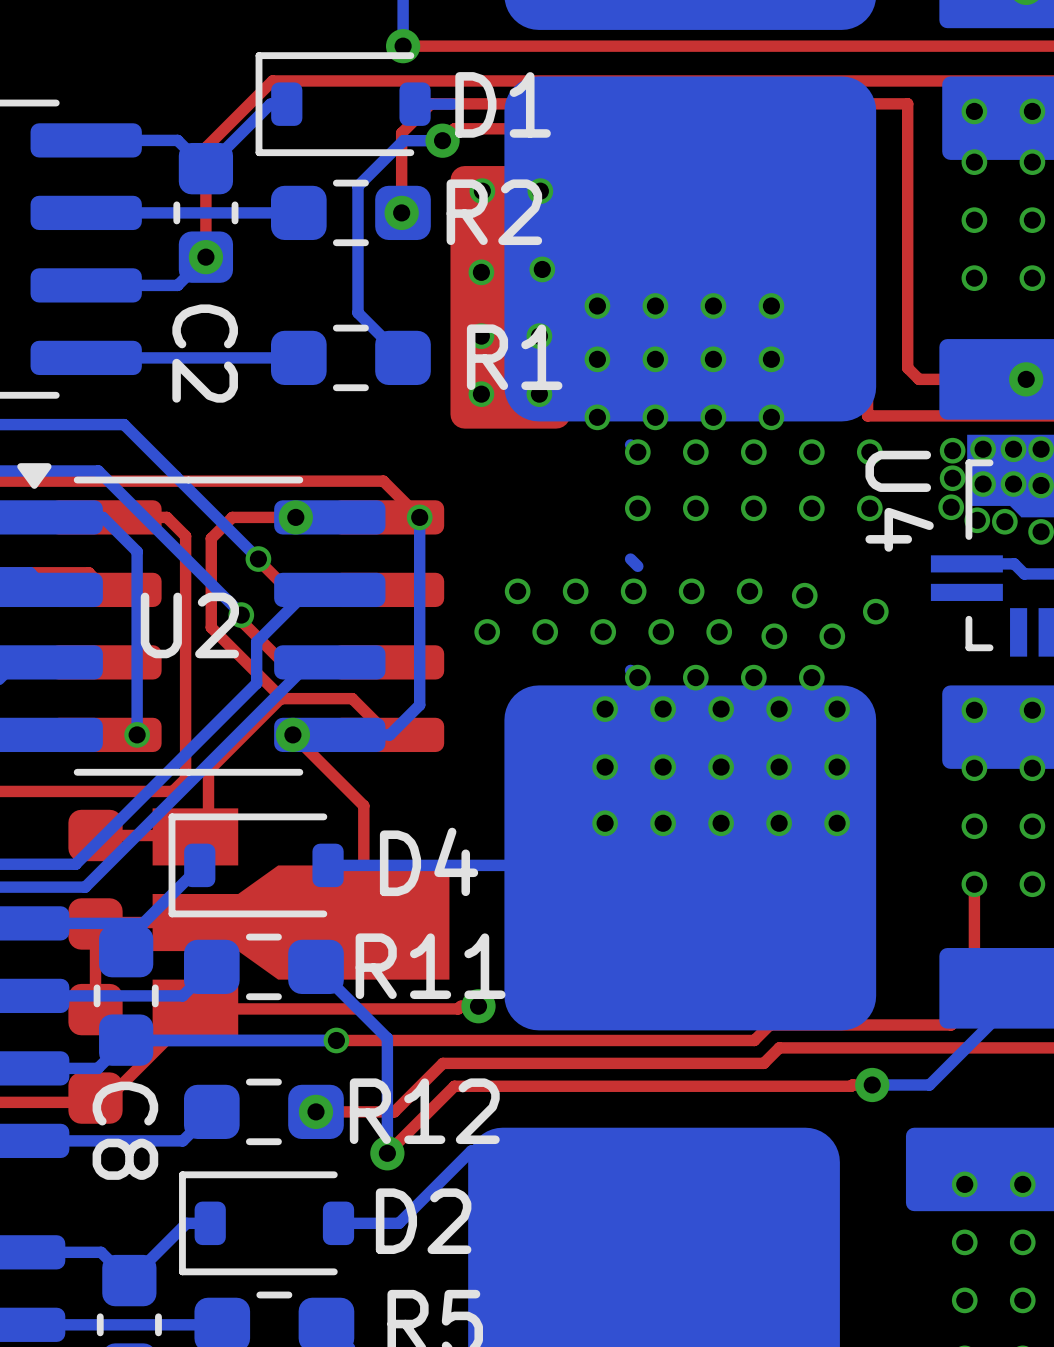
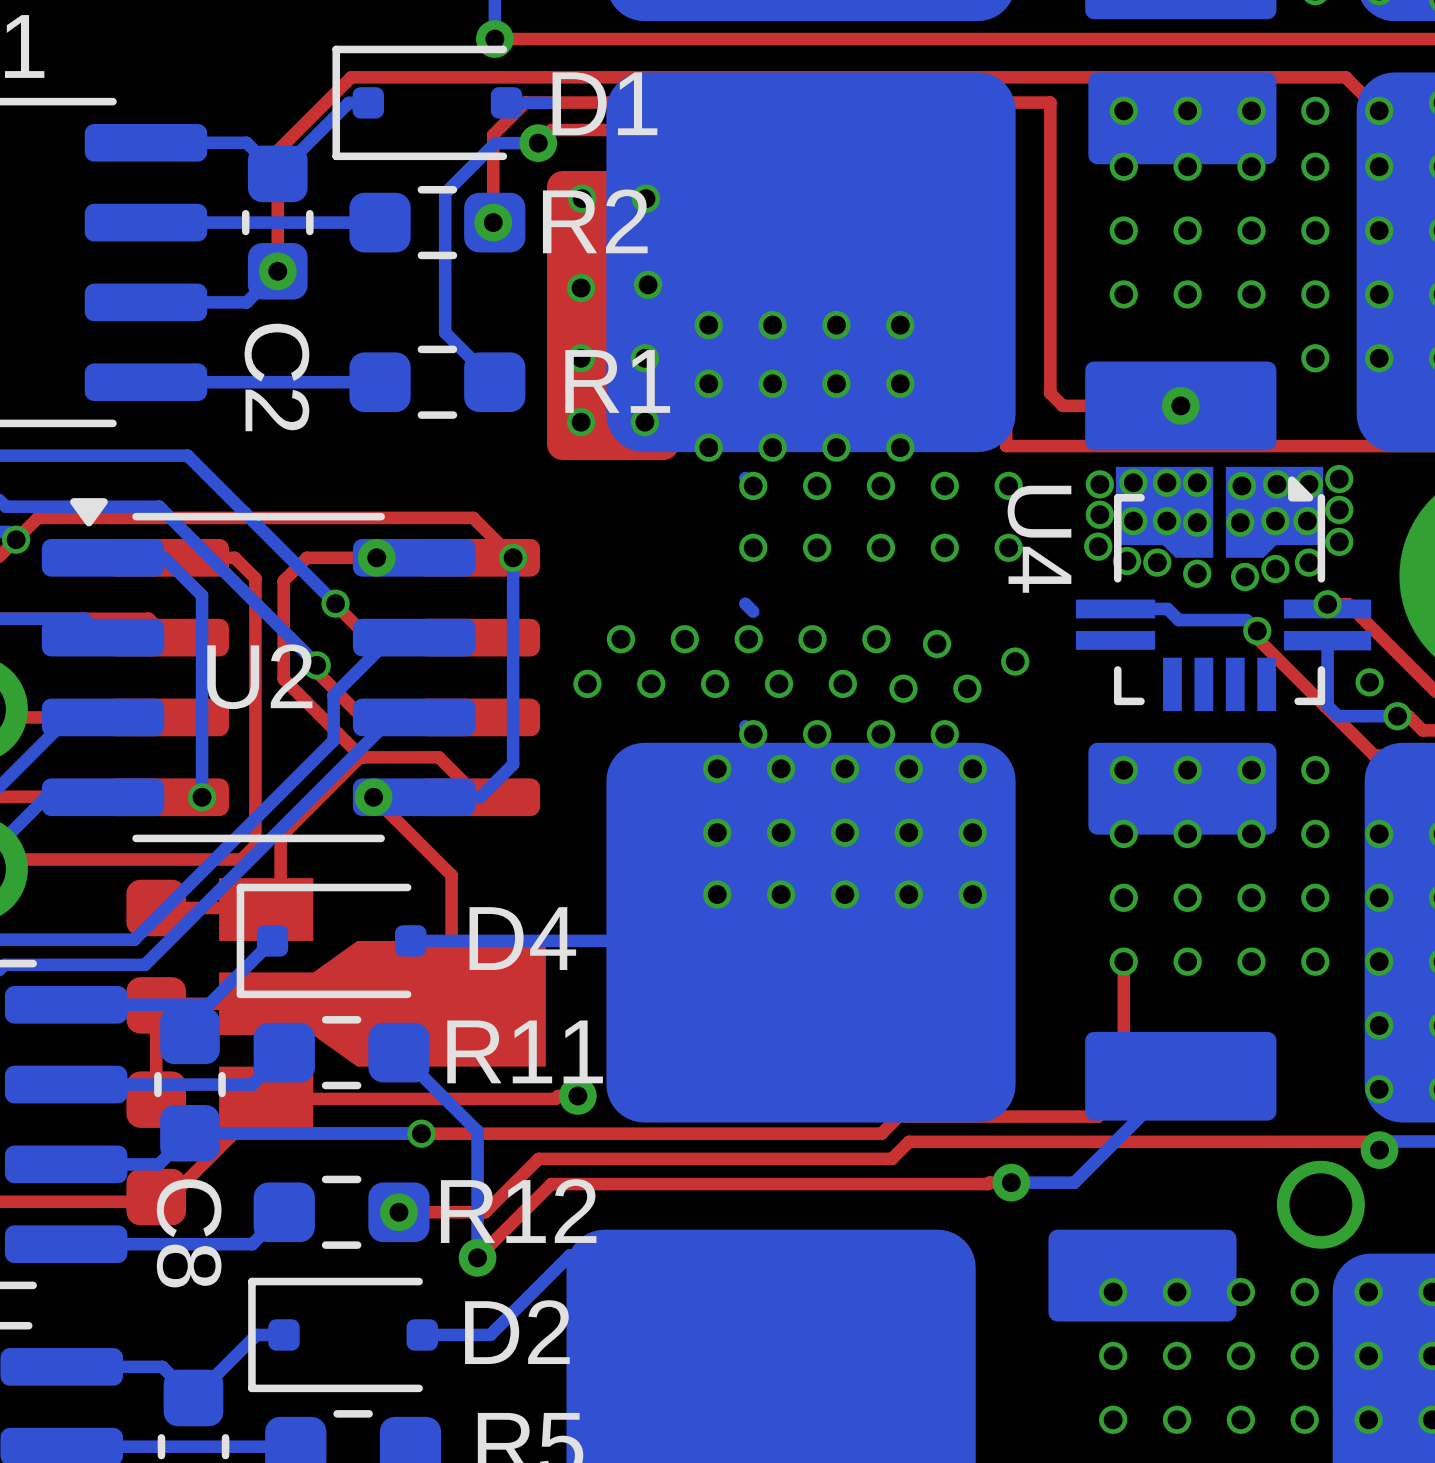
D1 footprint: [255, 52, 431, 157] -> [332, 45, 523, 161]
D4 footprint: [168, 813, 344, 918] -> [236, 883, 427, 999]
D2 footprint: [179, 1171, 355, 1276] -> [248, 1277, 438, 1393]

